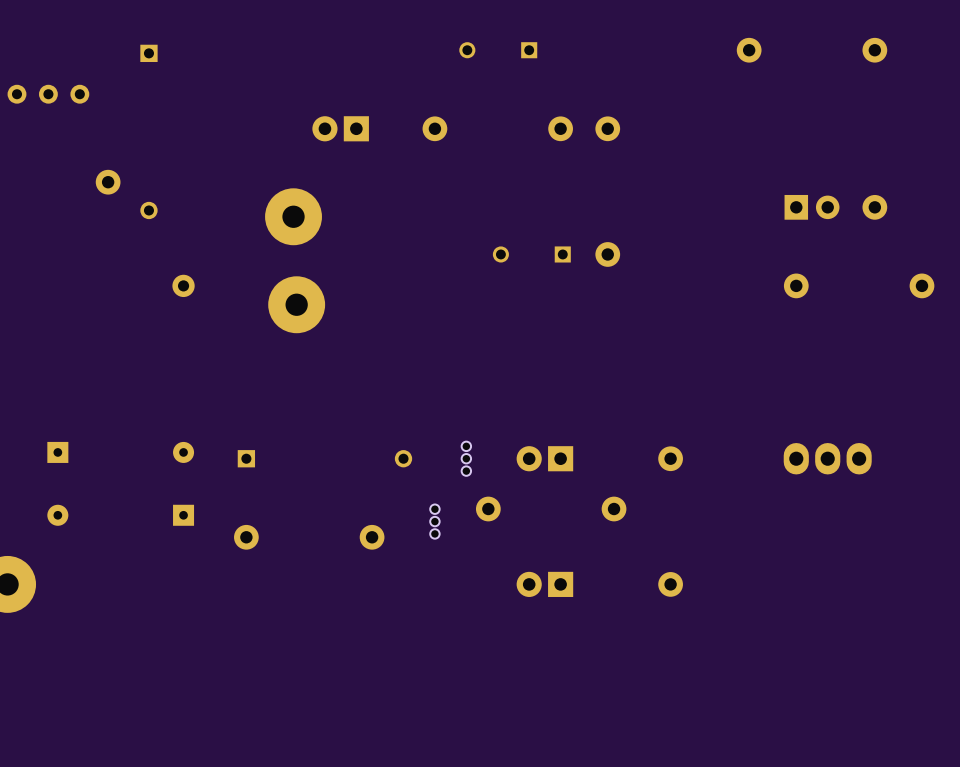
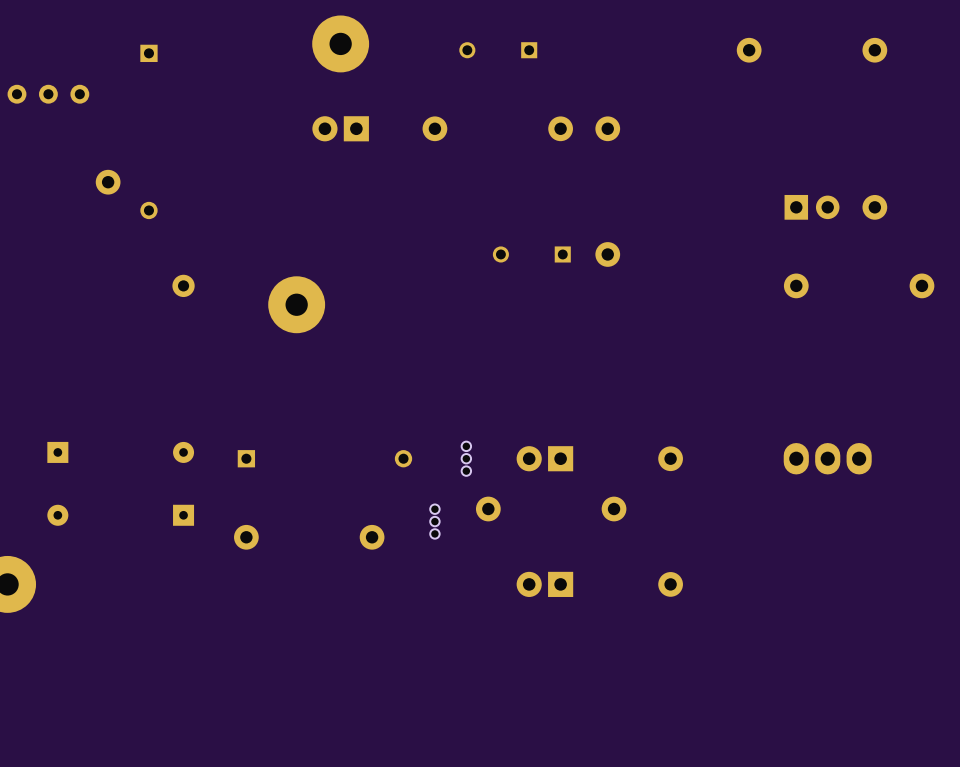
part position: (293, 216) -> (340, 43)

